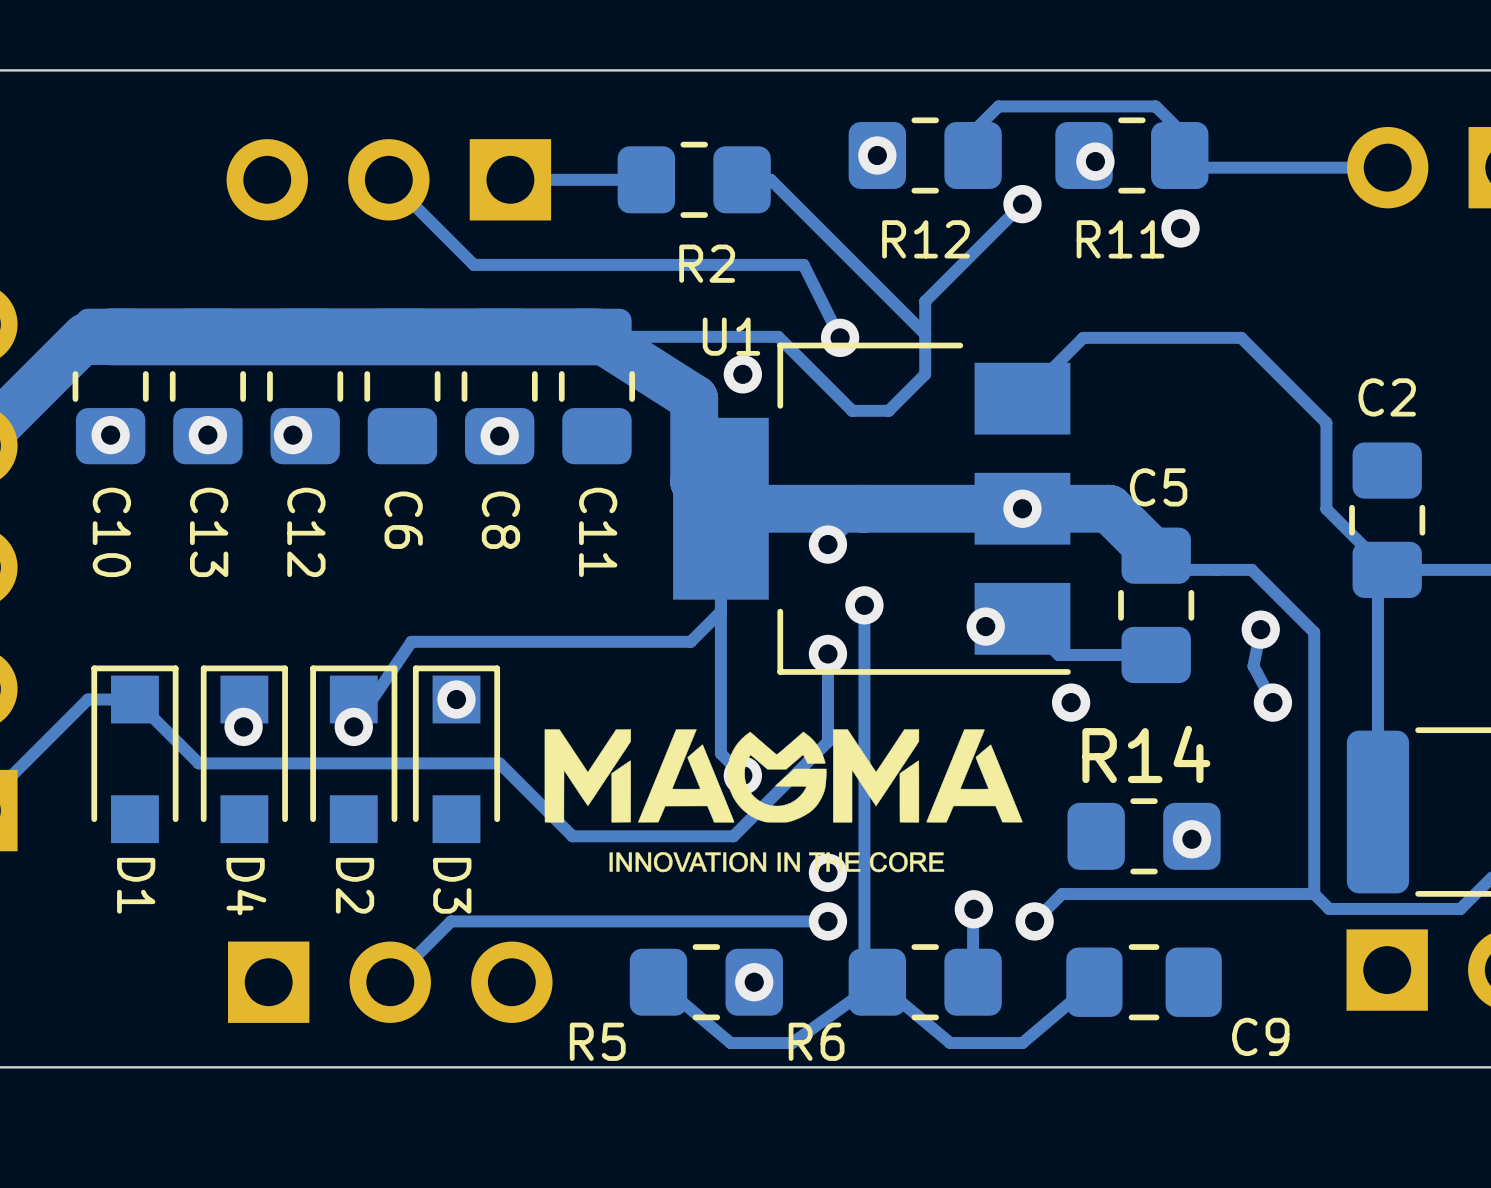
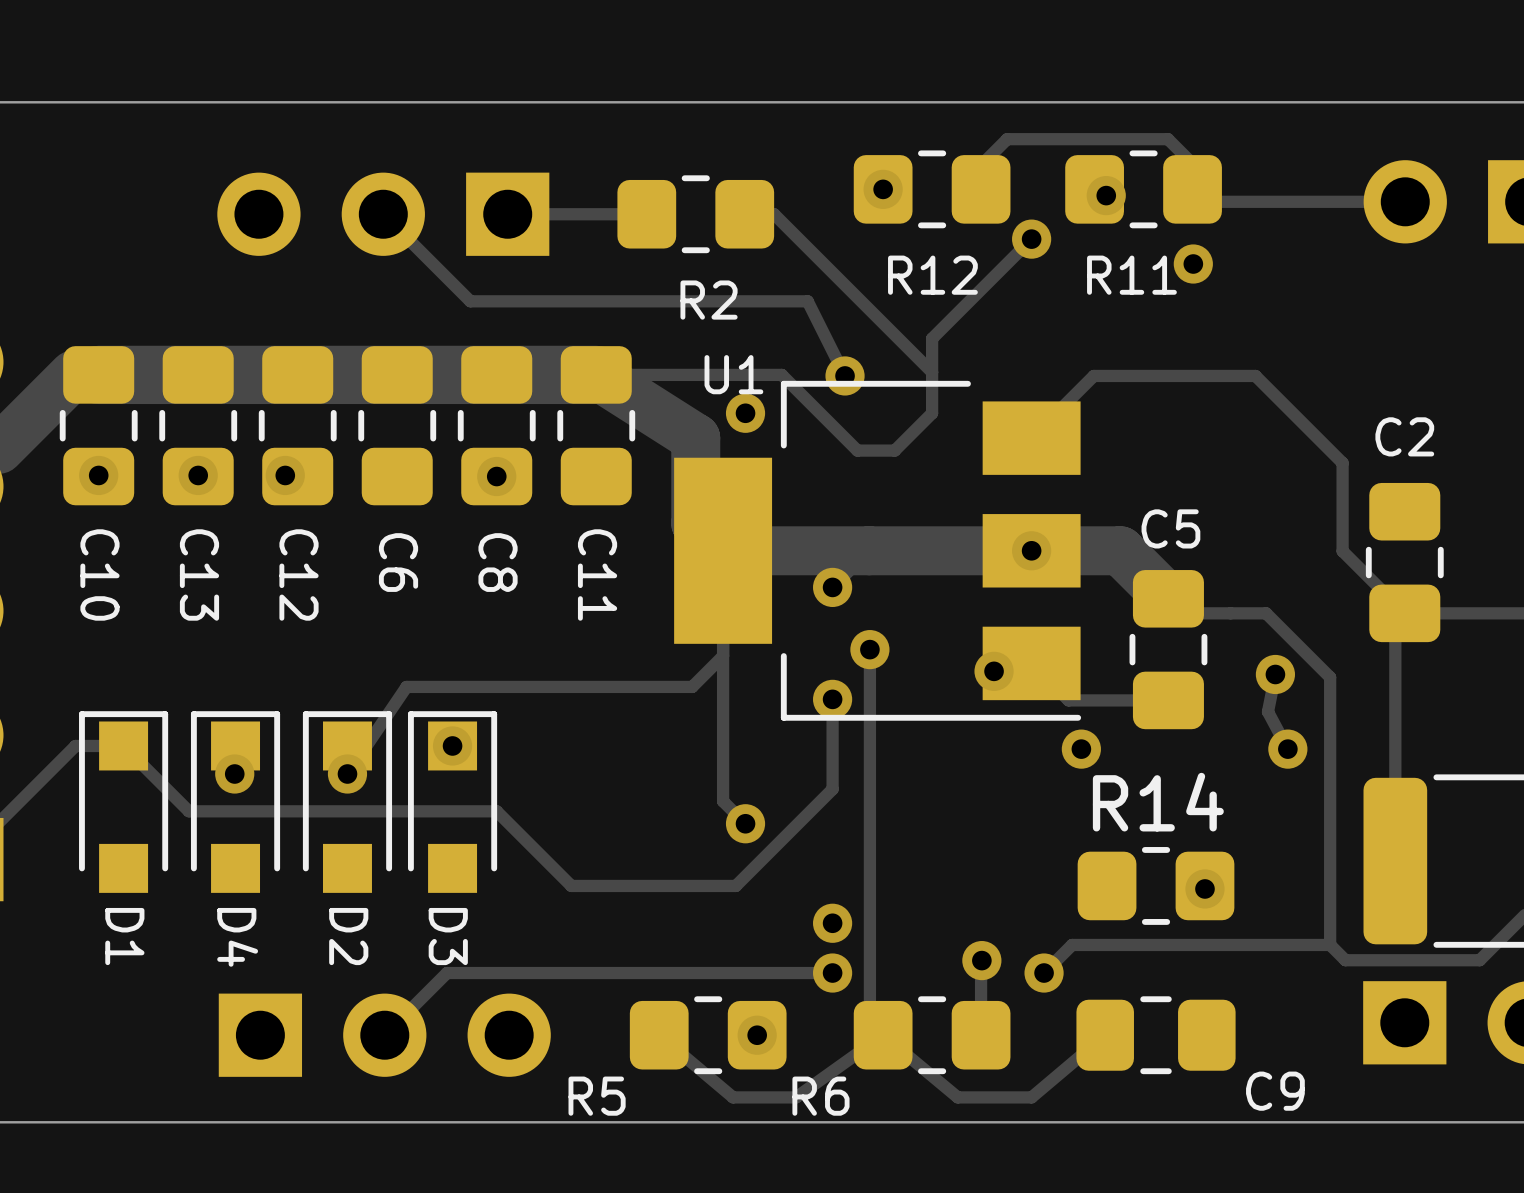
drawing: [544, 729, 1023, 873] -> none

